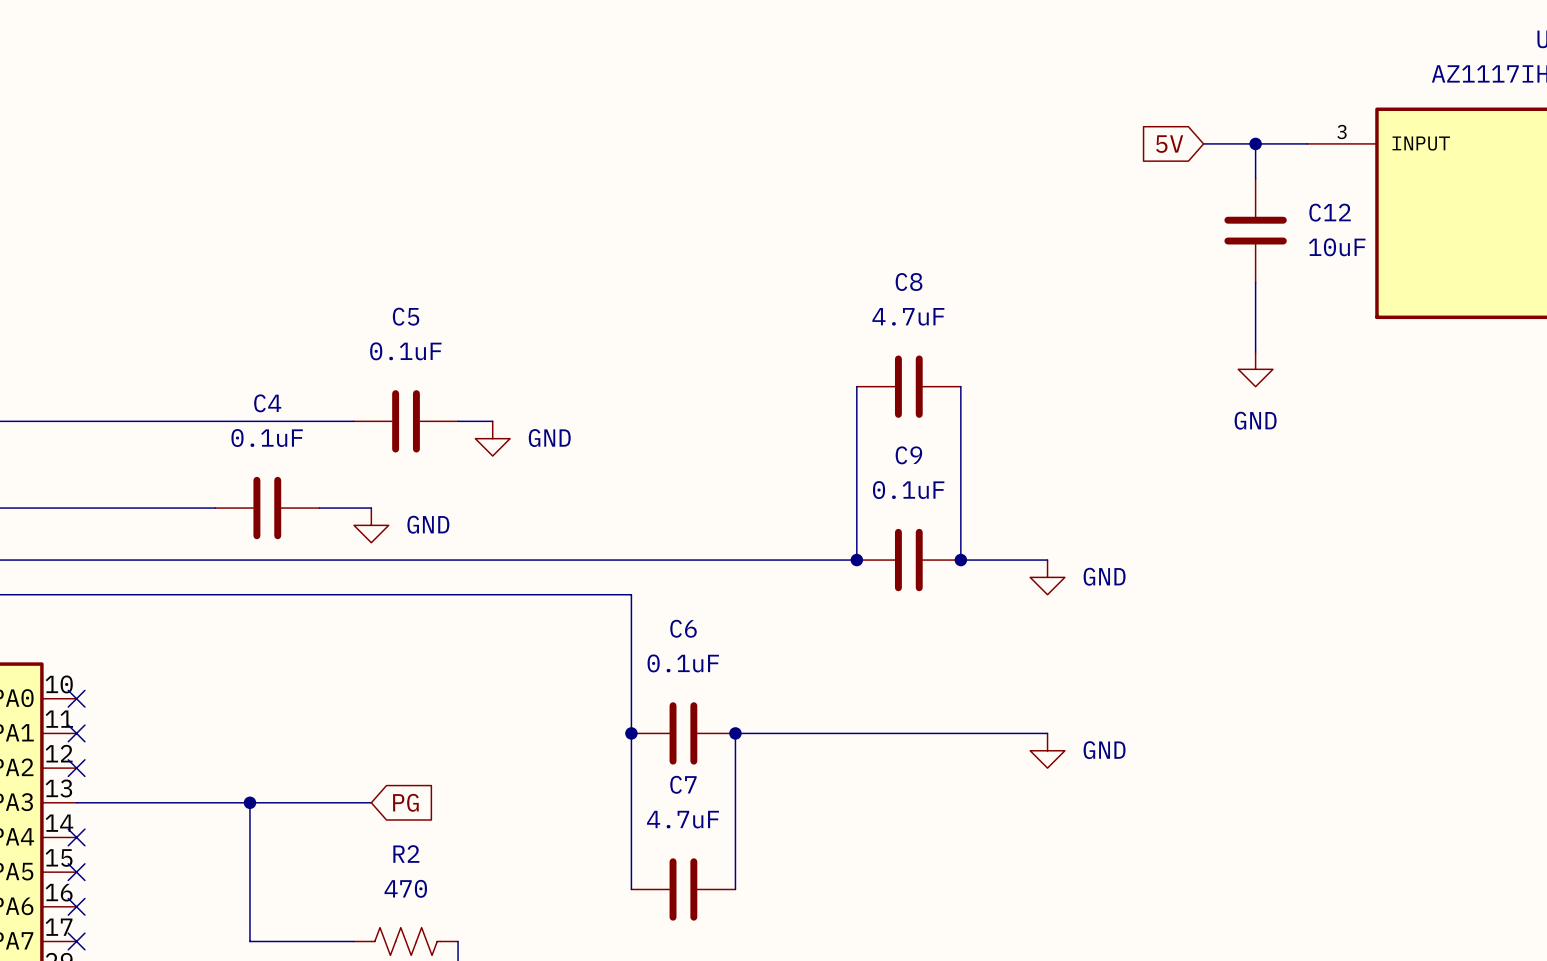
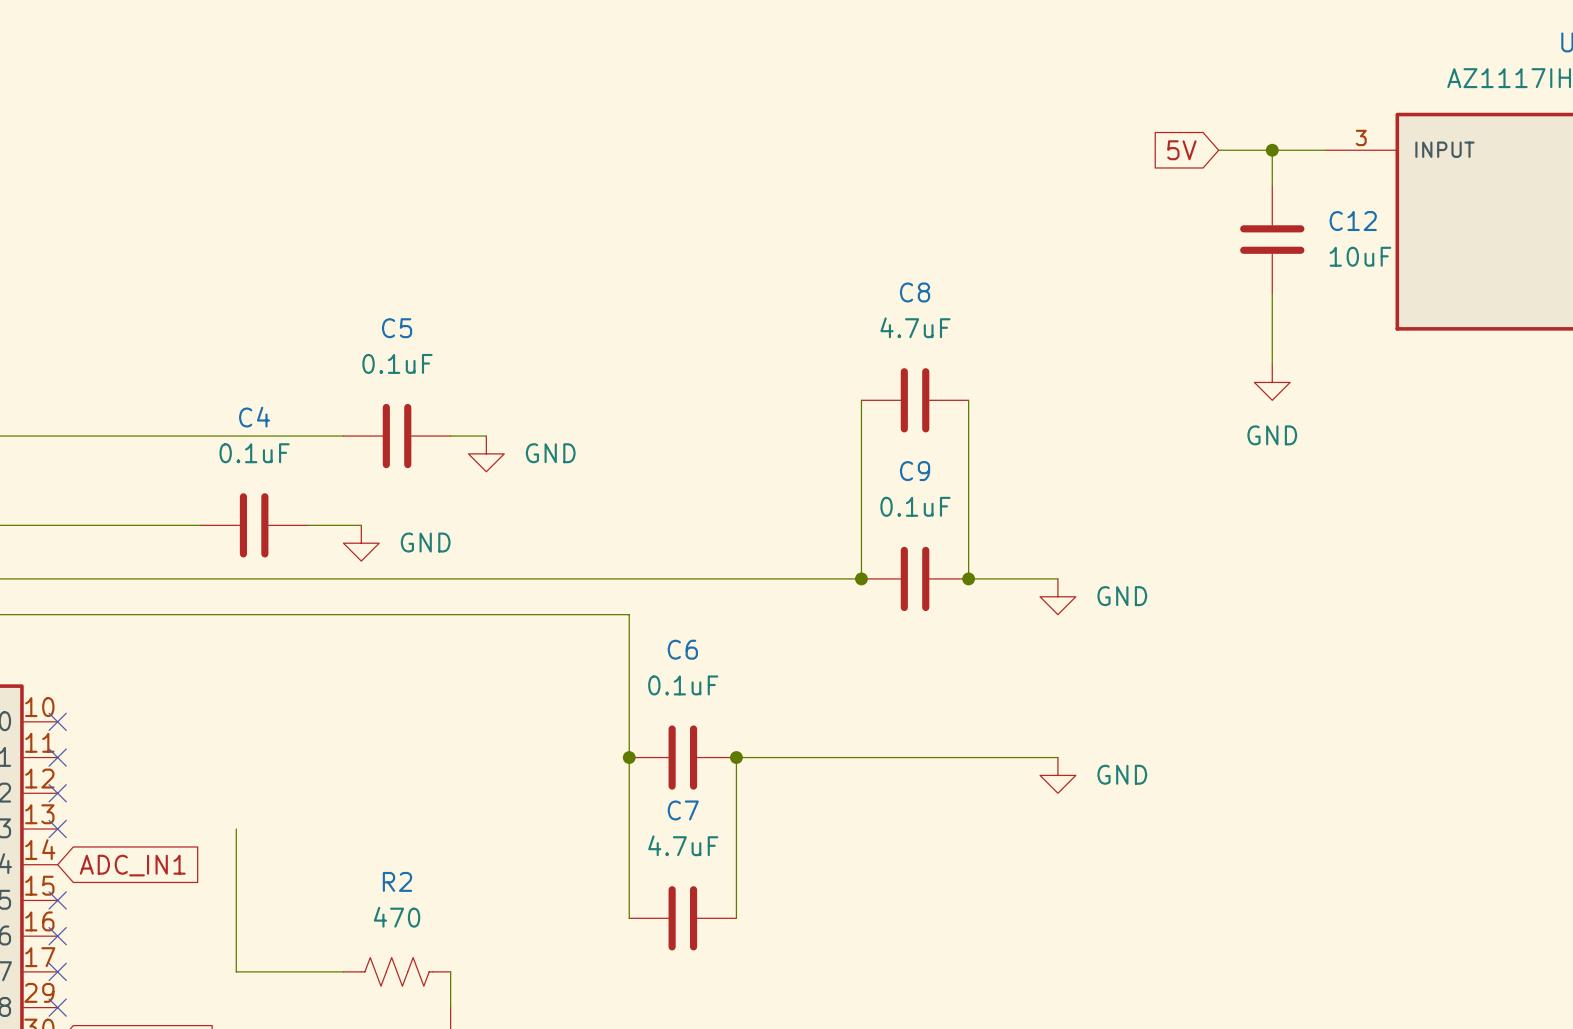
wire: (76, 802) (371, 802) -> none
junction: (249, 802) -> none
global label: PG (405, 802) -> none
no-connect mark position: (76, 837) -> (57, 829)
global label: none -> ADC_IN1 (132, 865)

